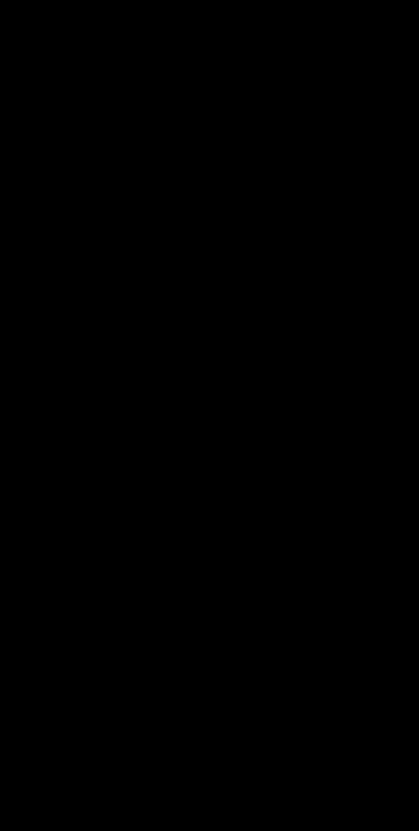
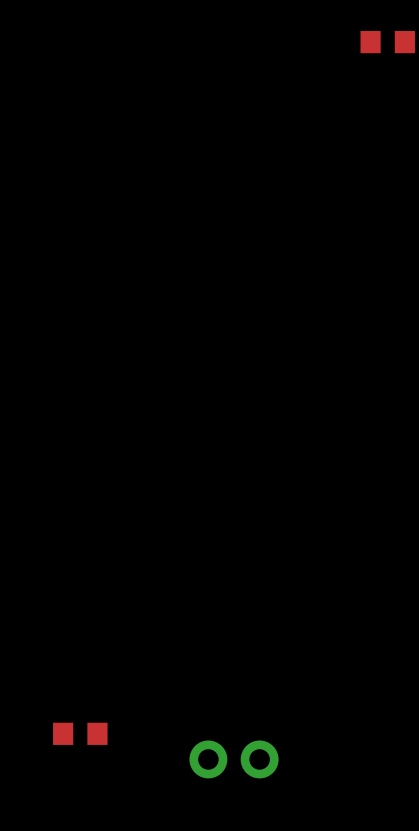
part: none -> (387, 42)
part: none -> (80, 733)
part: none -> (234, 759)

